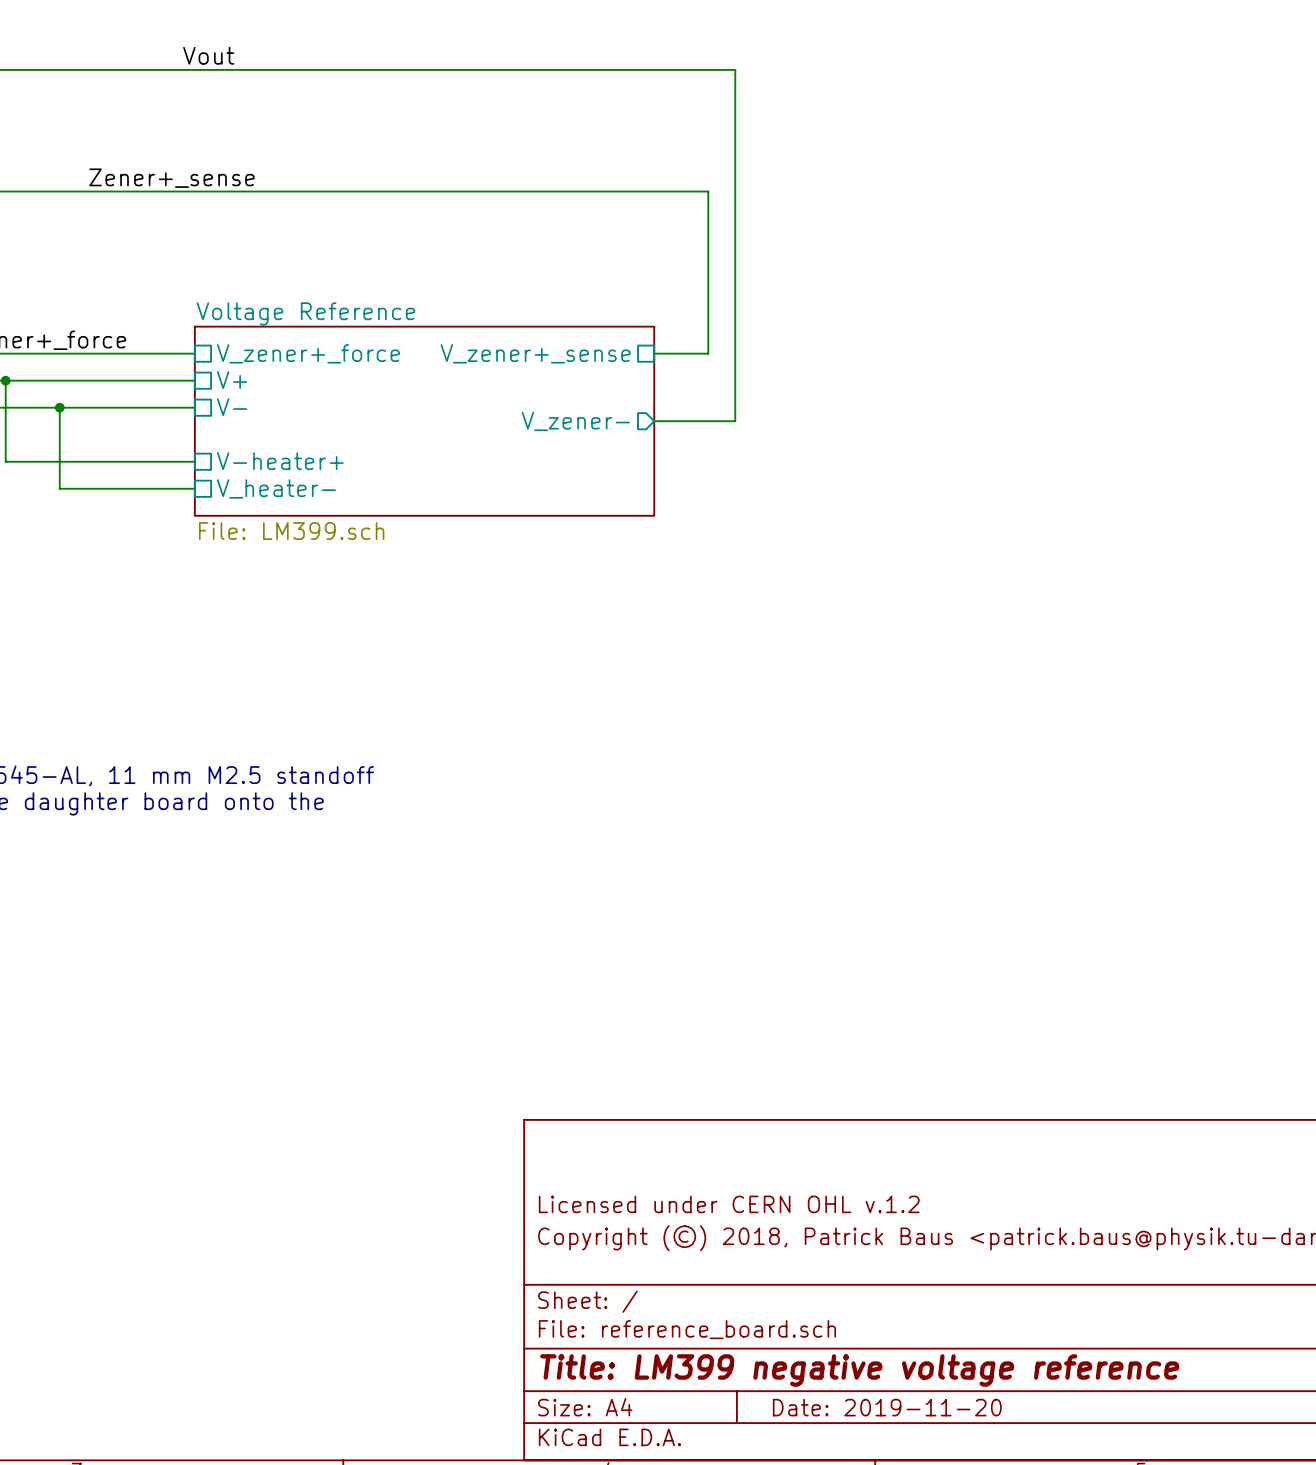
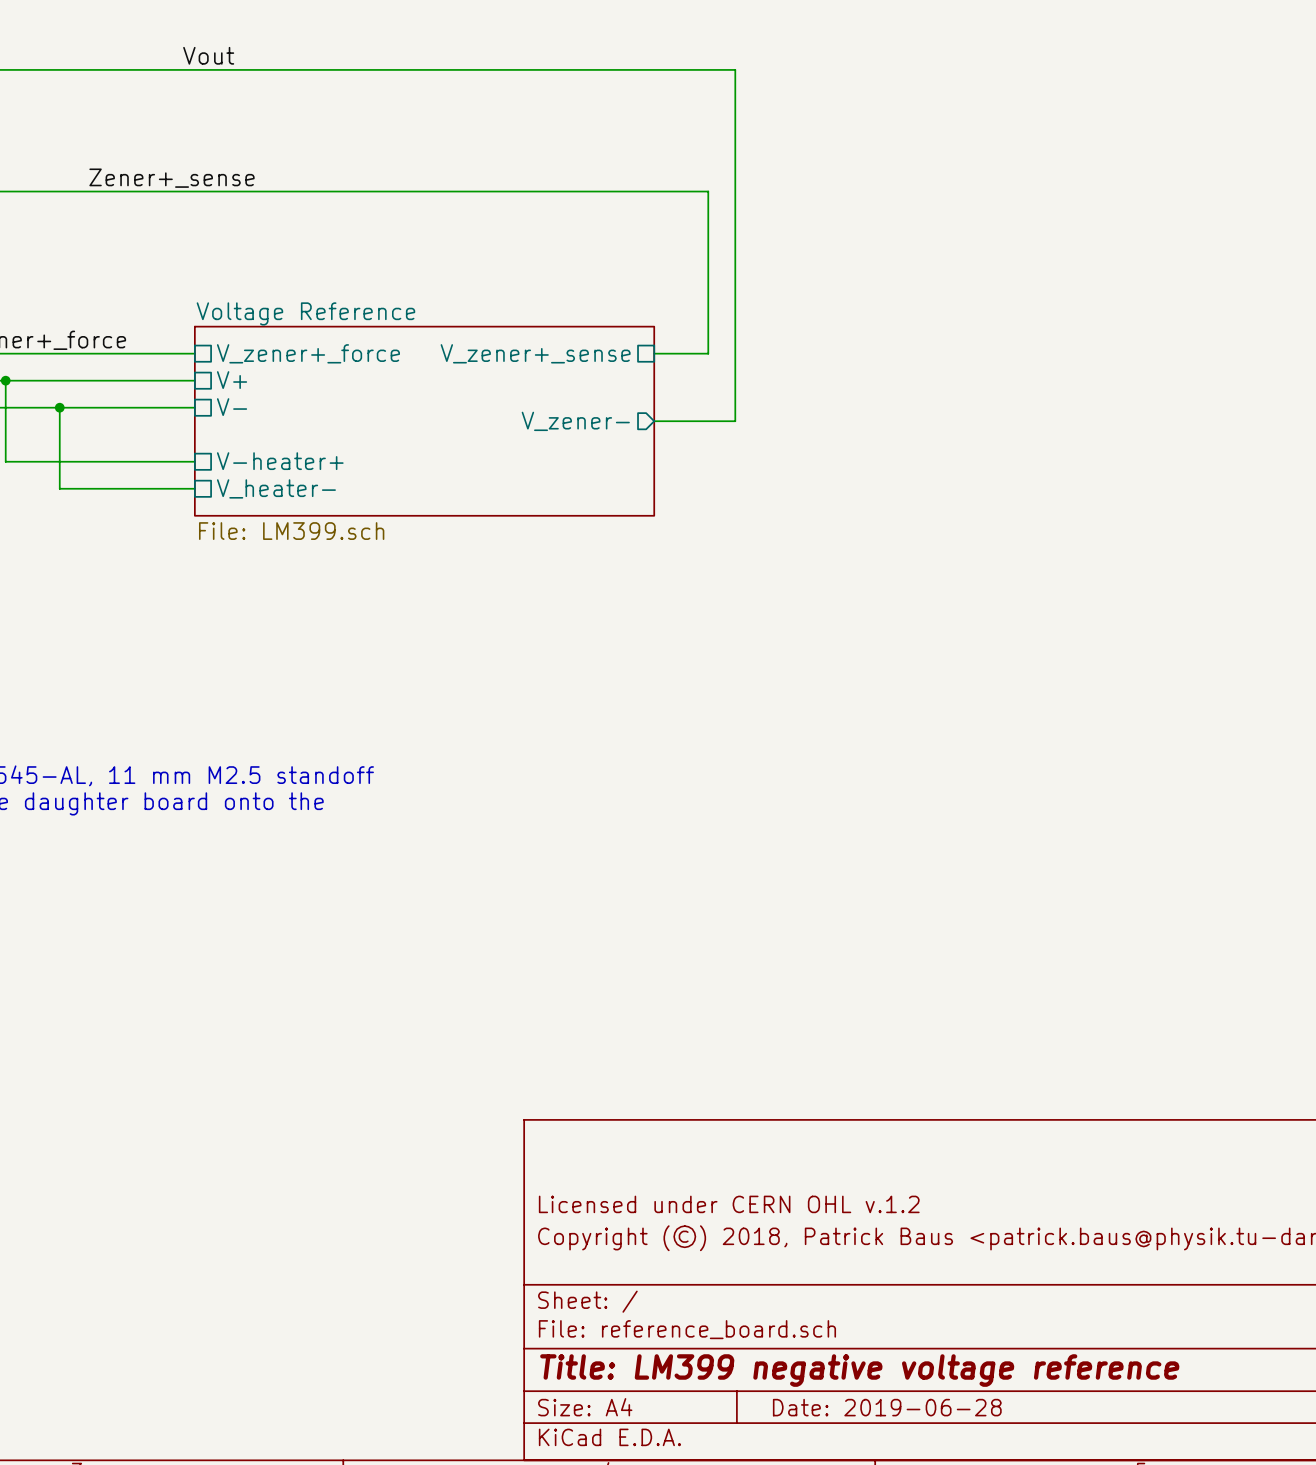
title block: Date: 2019-11-20 (887, 1407) -> Date: 2019-06-28 (887, 1407)

